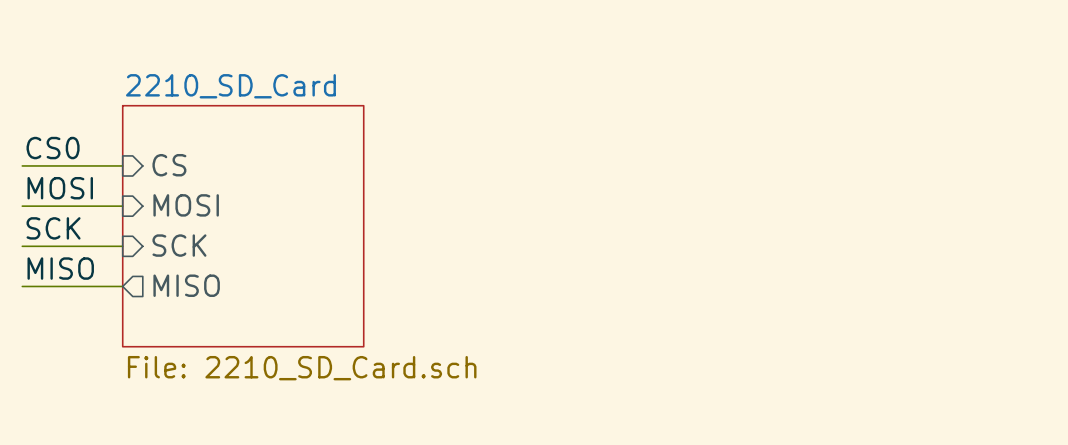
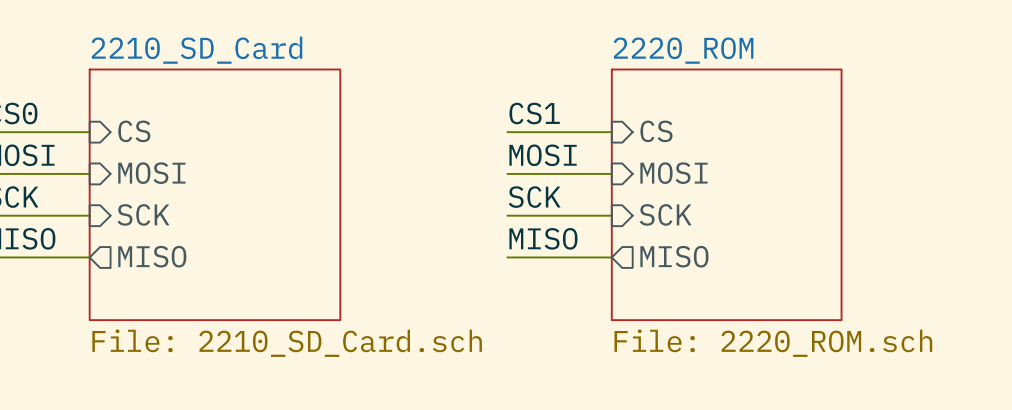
label: none -> CS1 (534, 113)
wire: none -> (507, 132) (611, 132)
sheet pin: none -> CS (656, 131)
label: none -> MOSI (543, 155)
sheet pin: none -> MOSI (674, 173)
wire: none -> (507, 173) (611, 173)
sheet 2220_ROM: none -> File: 2220_ROM.sch (726, 194)
label: none -> SCK (534, 197)
sheet pin: none -> SCK (665, 214)
wire: none -> (507, 215) (611, 215)
label: none -> MISO (543, 238)
sheet pin: none -> MISO (674, 256)
wire: none -> (507, 257) (611, 257)

